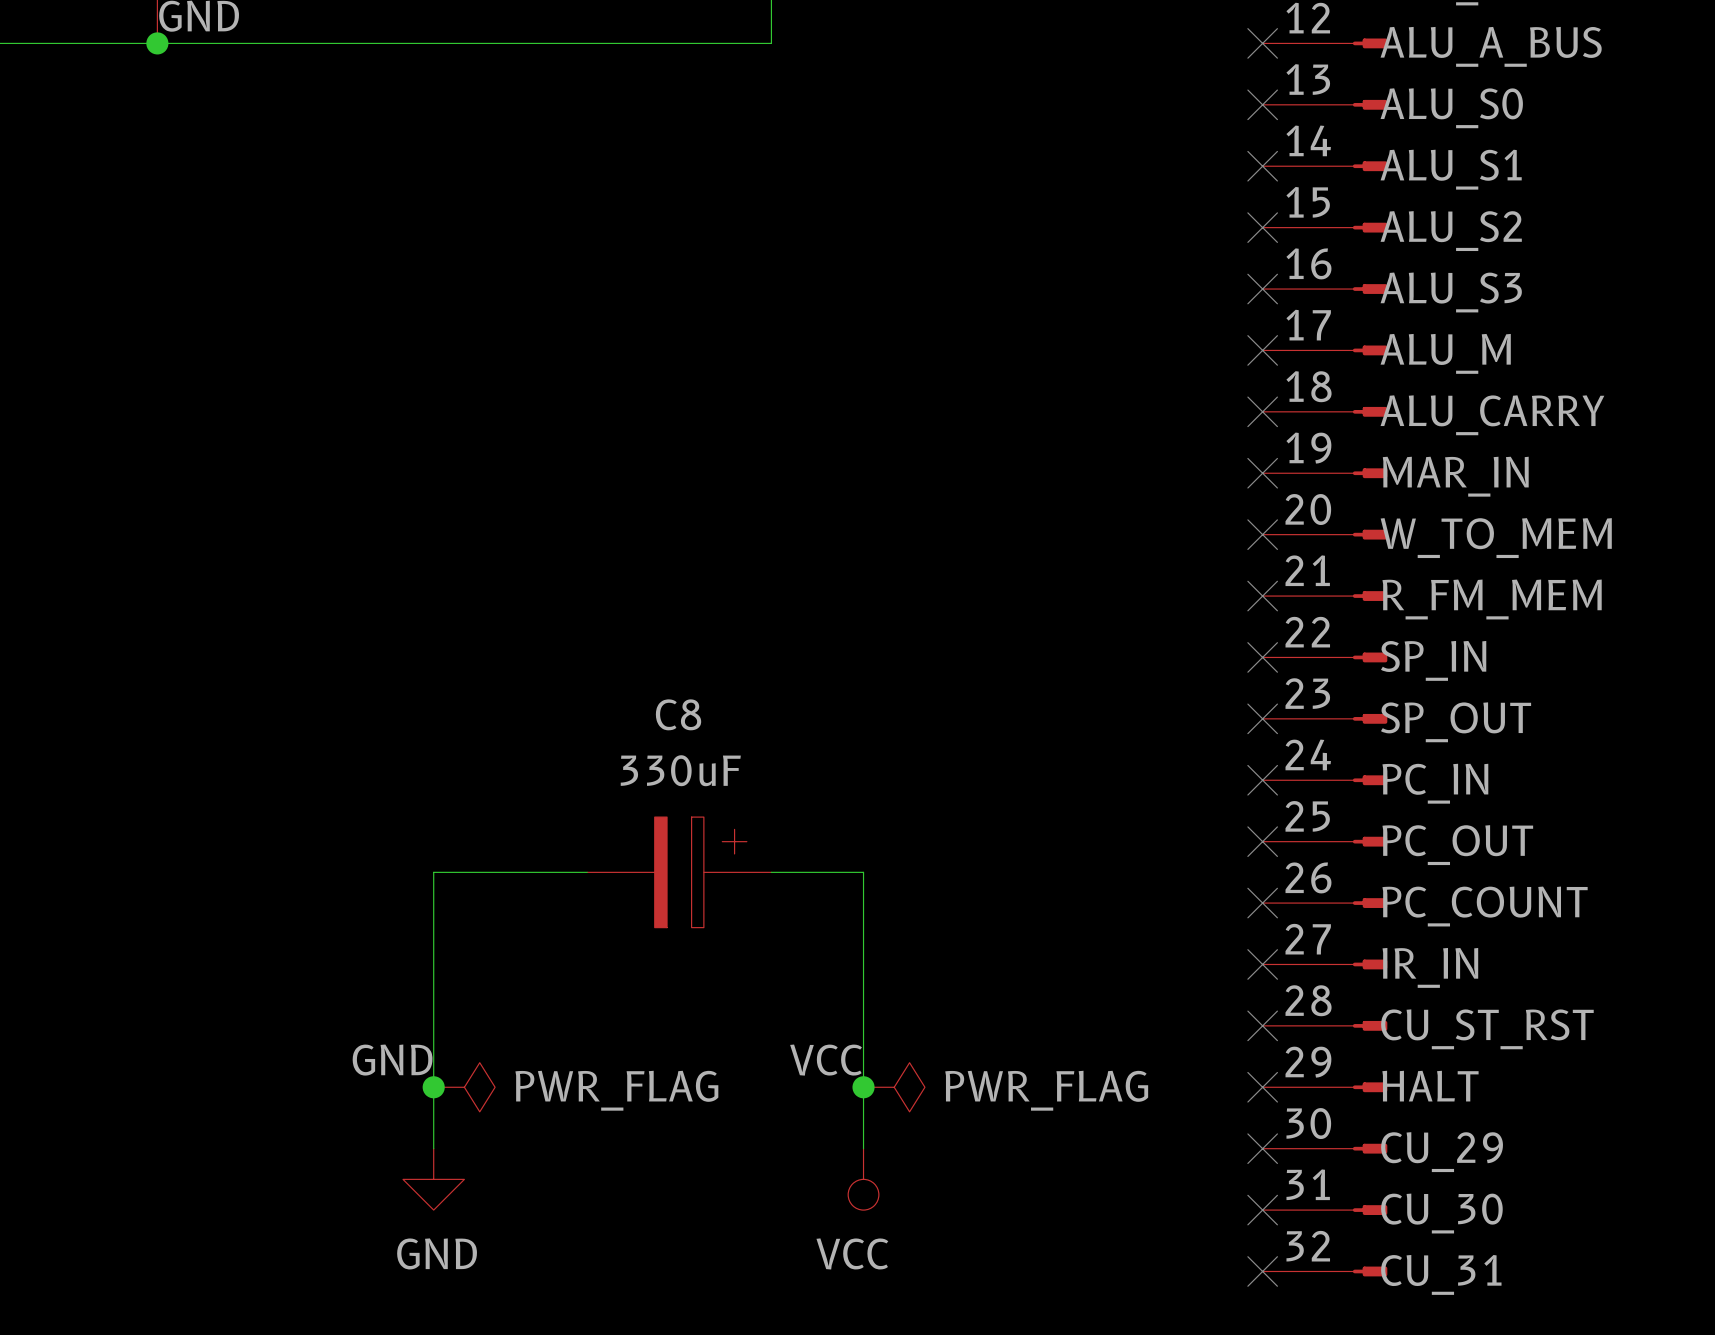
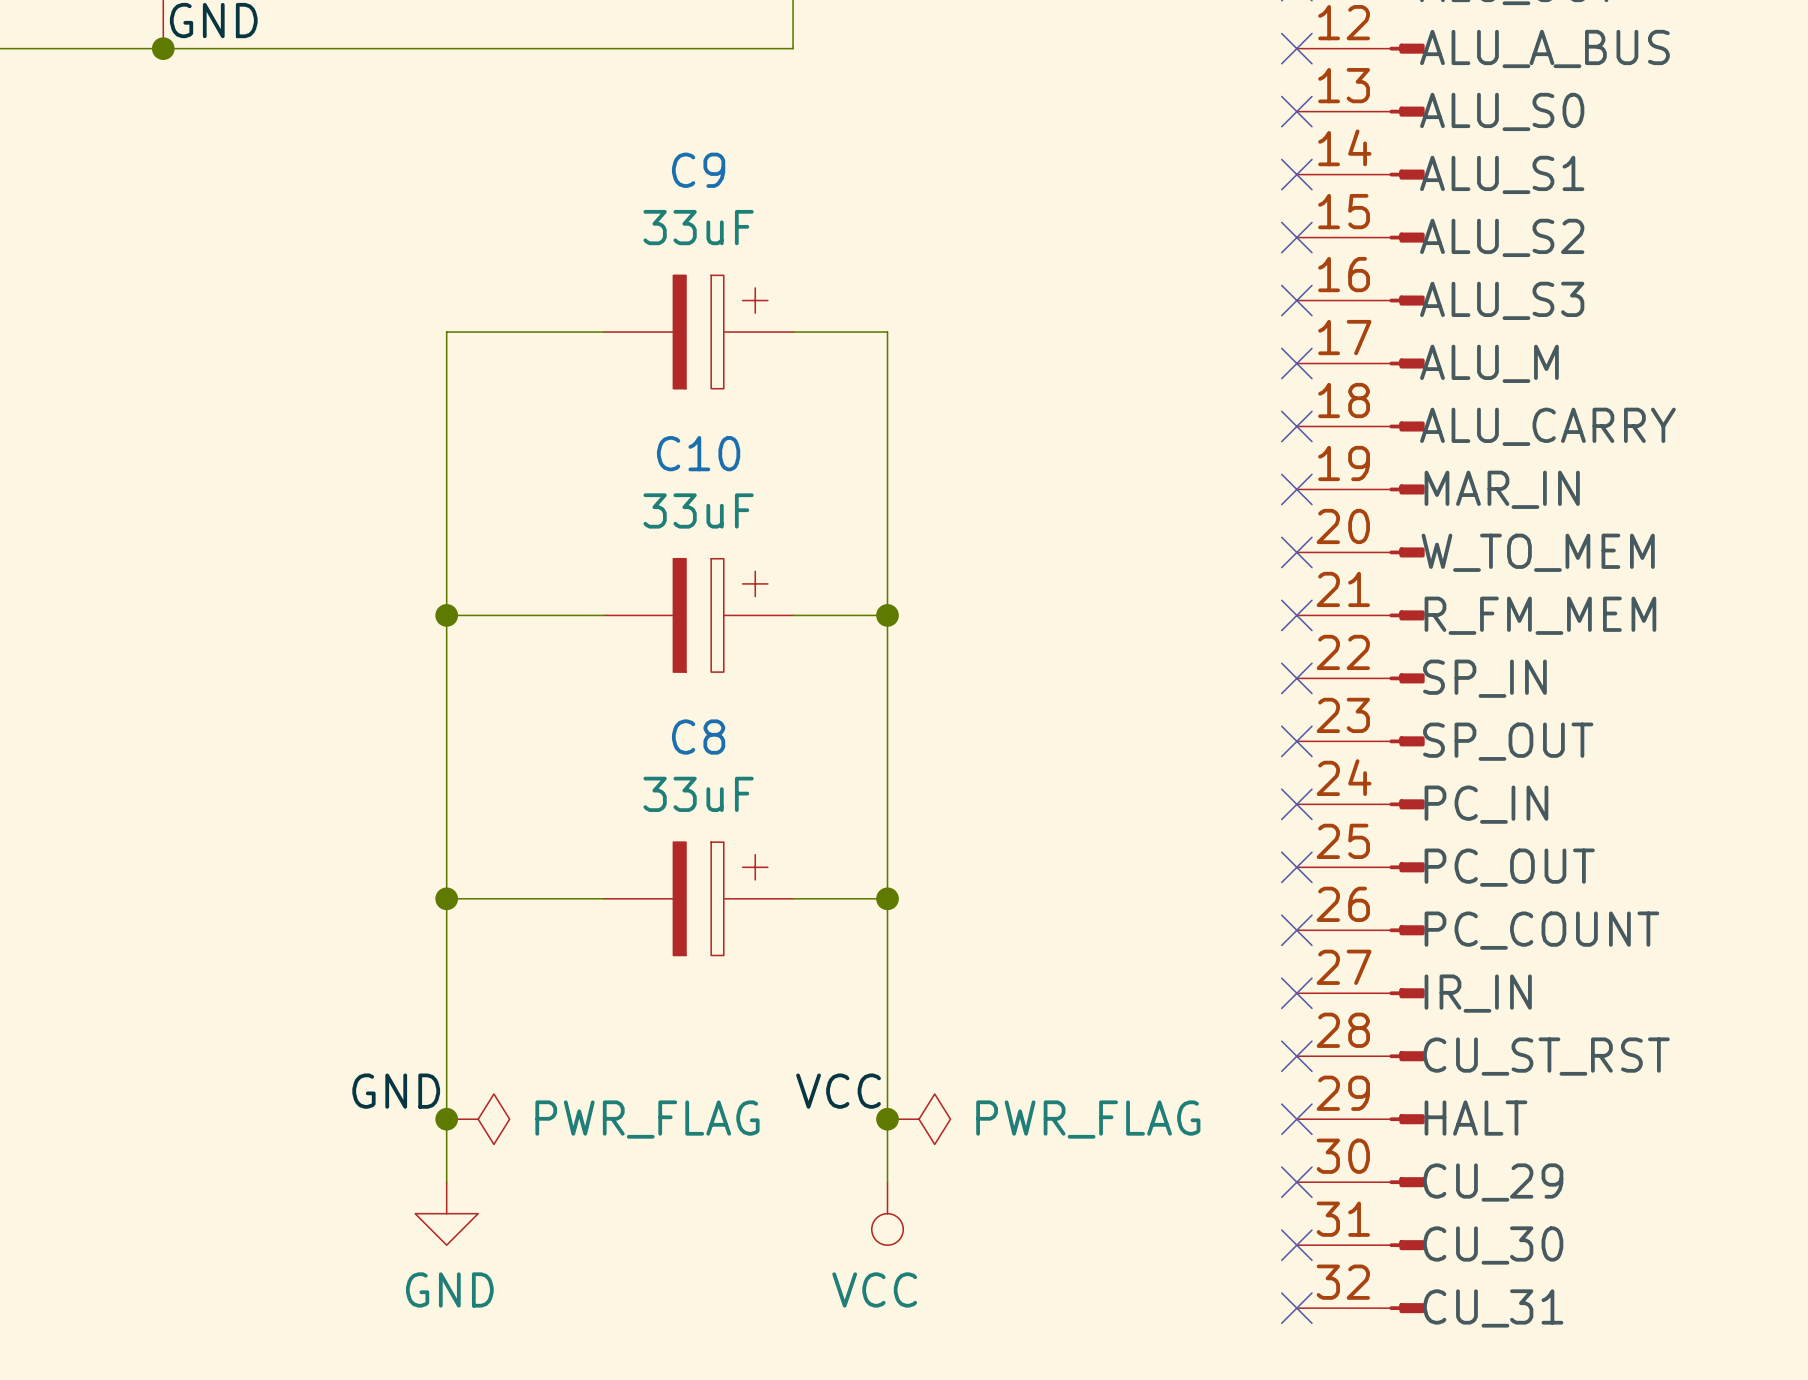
wire: none -> (604, 332) (446, 332) (446, 898)
C9: none -> 33uF (698, 332)
wire: none -> (793, 332) (887, 332) (887, 898)
wire: none -> (446, 615) (604, 615)
junction: none -> (446, 615)
C10: none -> 33uF (698, 615)
wire: none -> (793, 615) (887, 615)
junction: none -> (887, 615)
C8 value: 330uF (680, 770) -> 33uF (698, 794)
junction: none -> (446, 898)
junction: none -> (887, 898)

